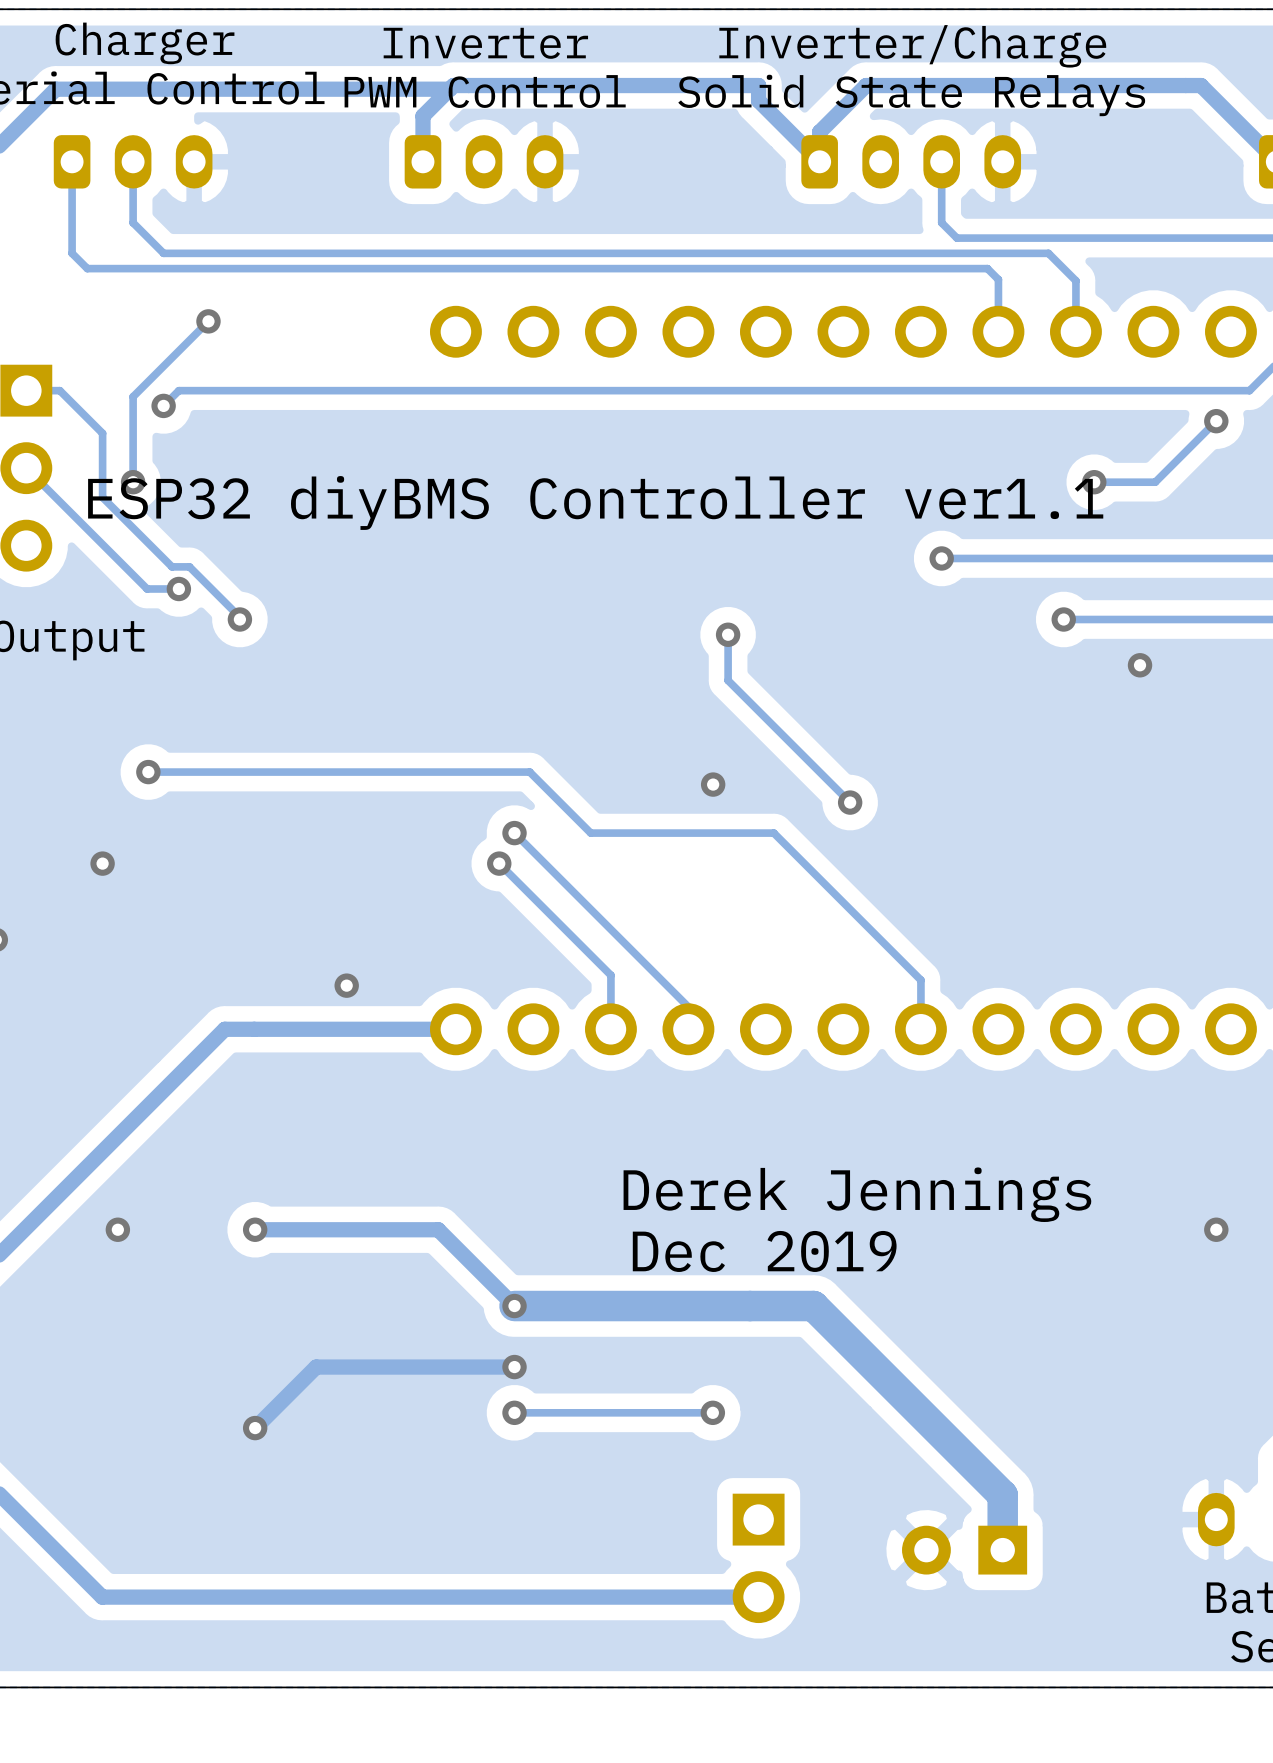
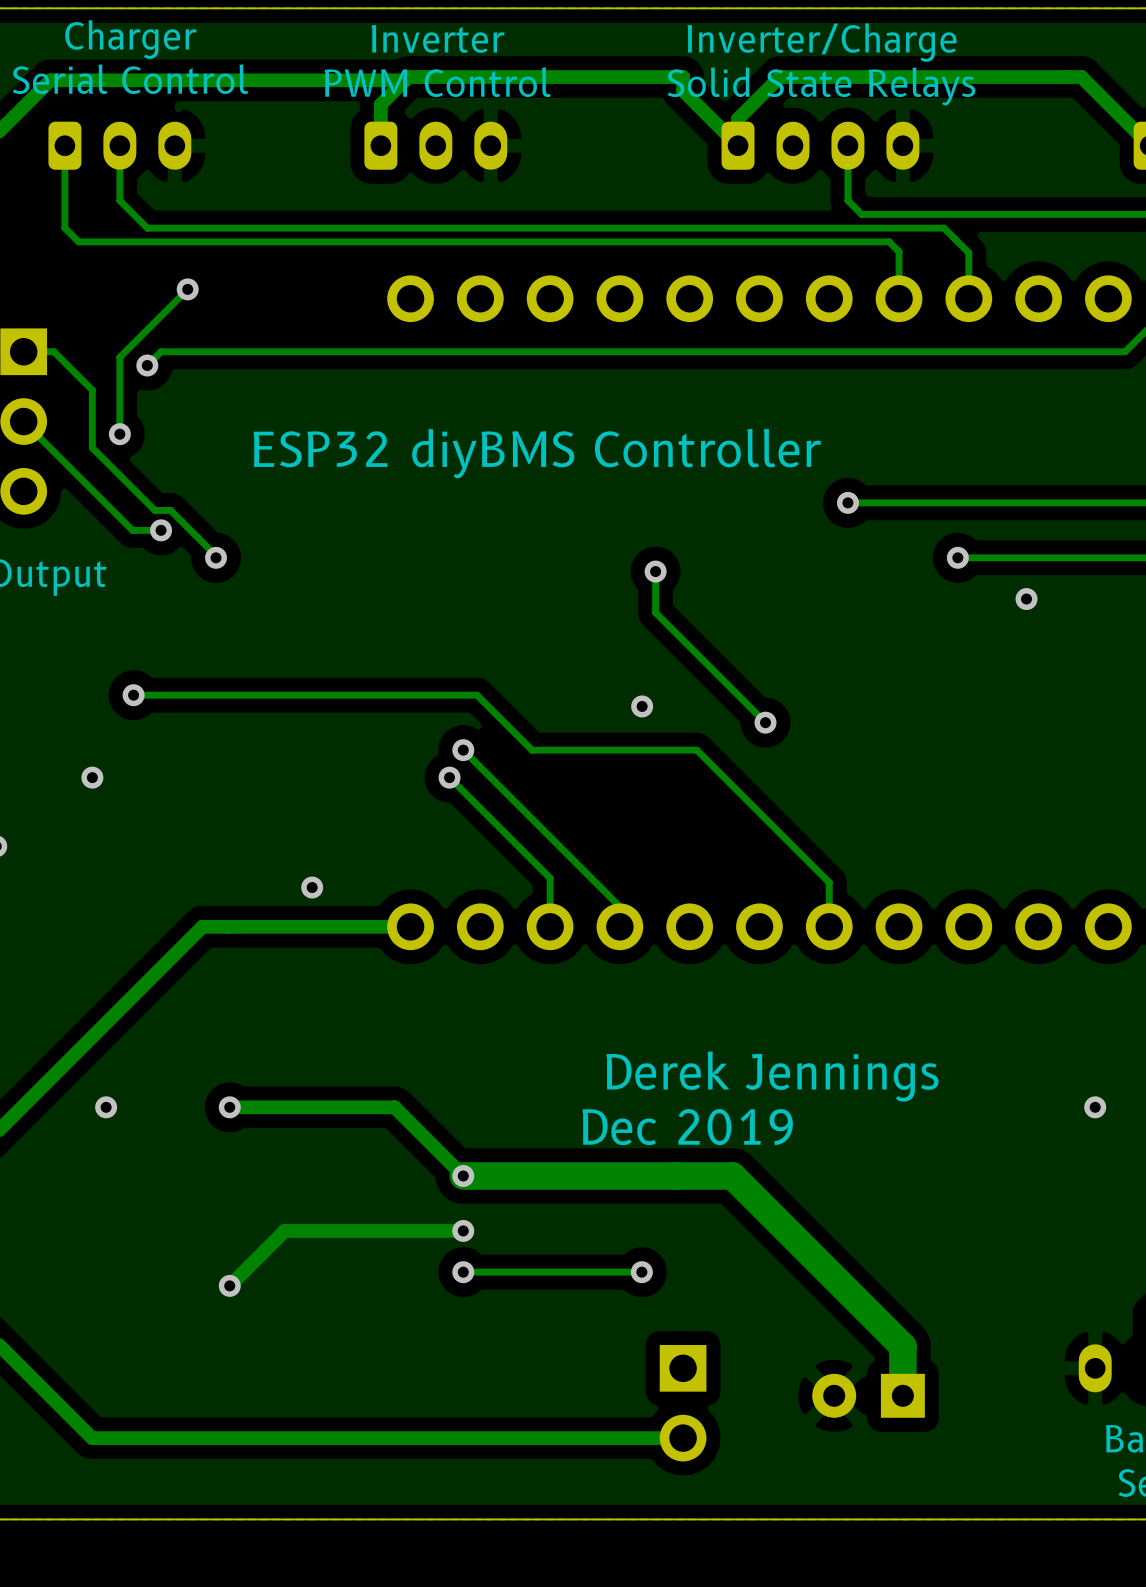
track: (1216, 421) (1155, 482) (1094, 482) -> none
via: (1216, 421) -> none
via: (1094, 482) -> none
text: ESP32 diyBMS Controller ver1.1 (595, 502) -> ESP32 diyBMS Controller (537, 453)

